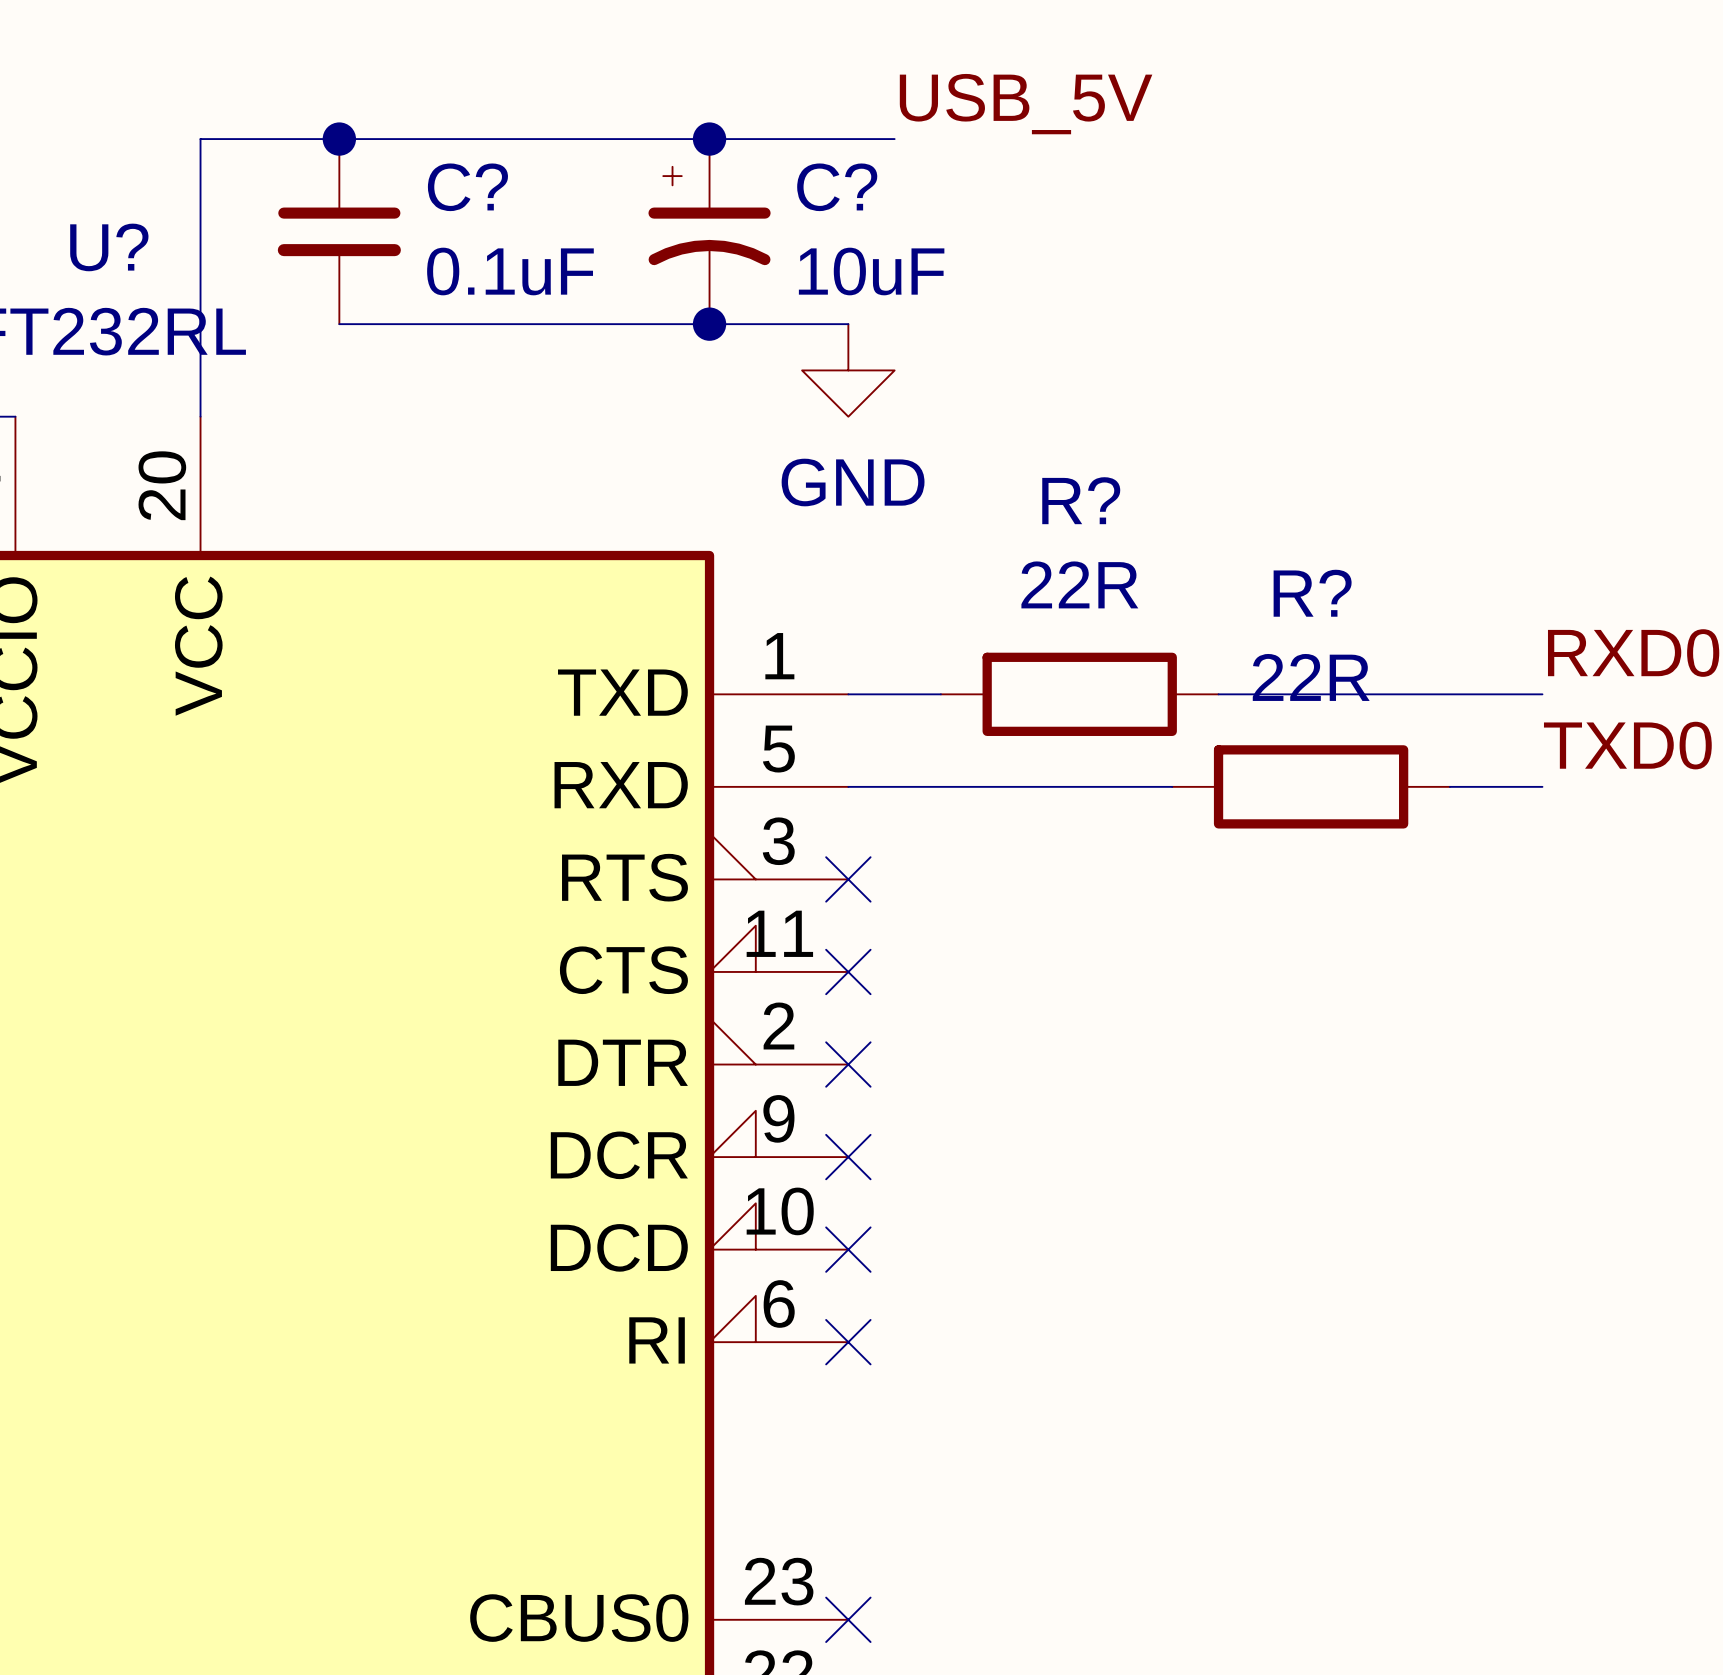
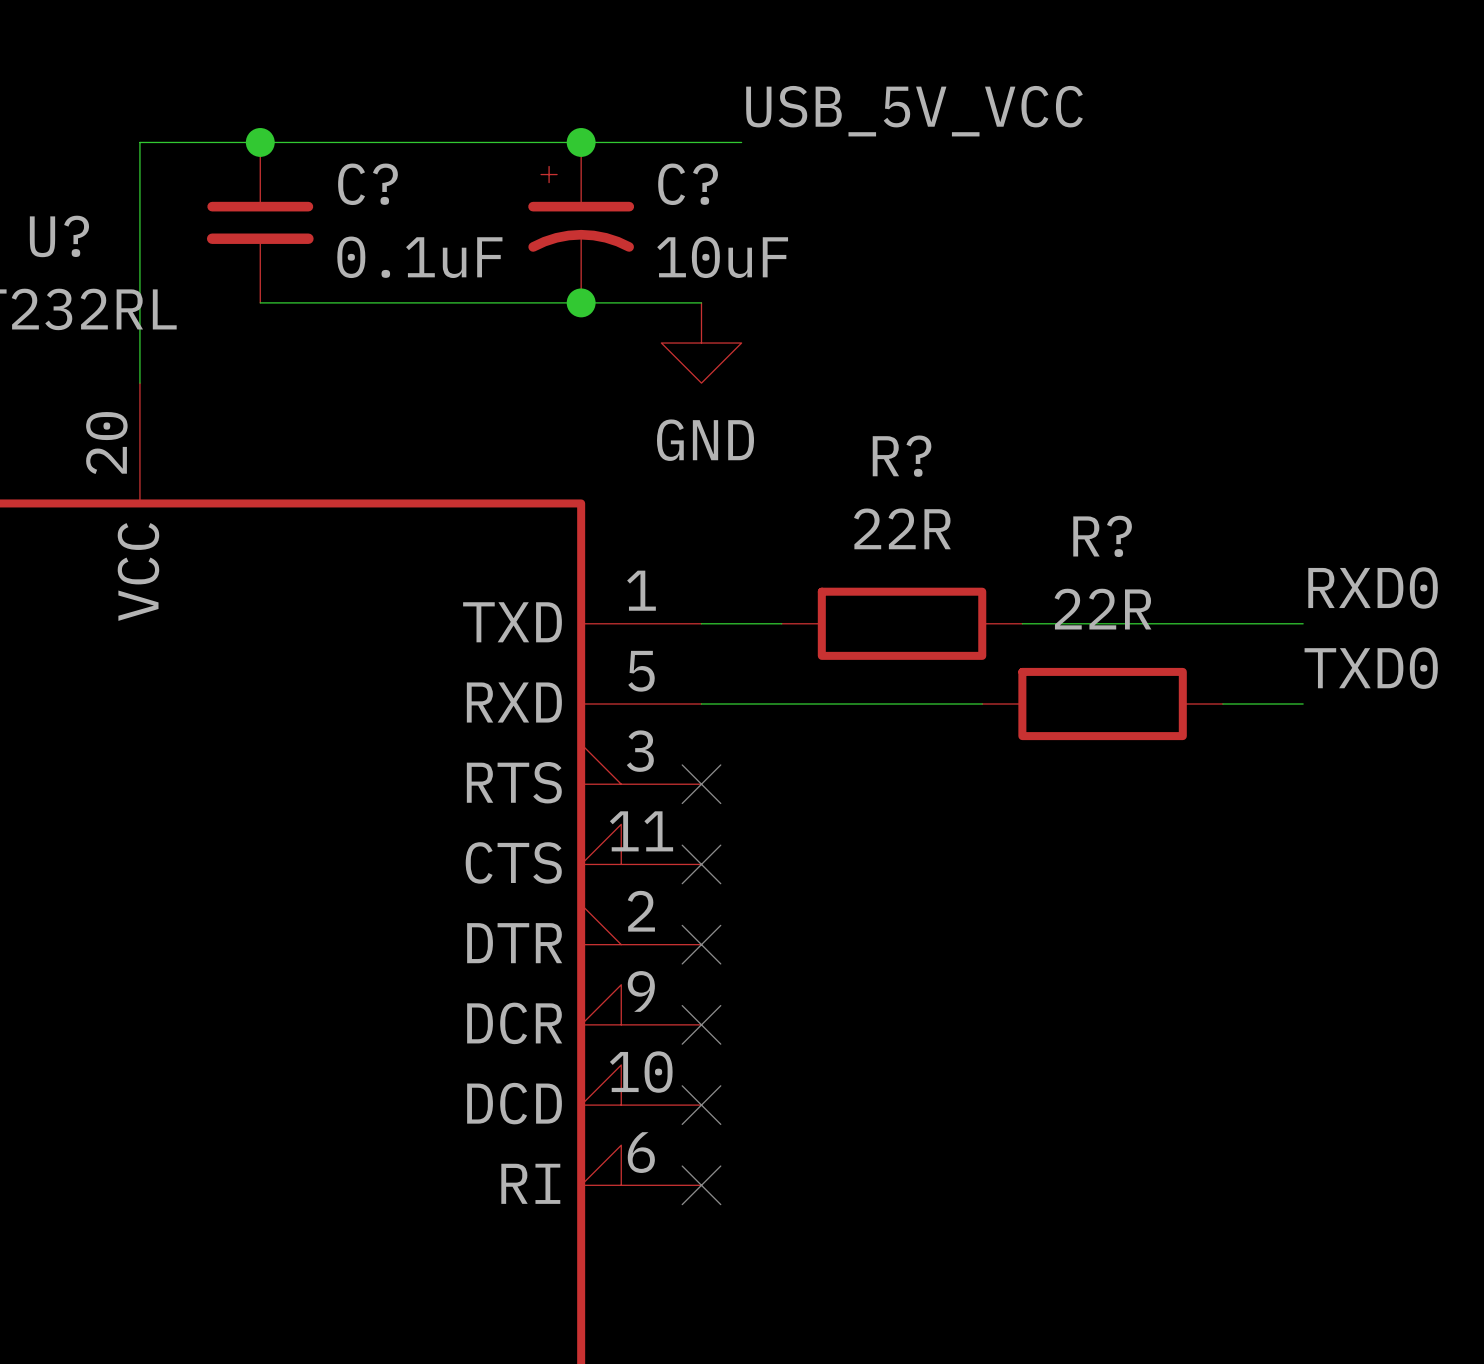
label: USB_5V (1026, 104) -> USB_5V_VCC (914, 111)

